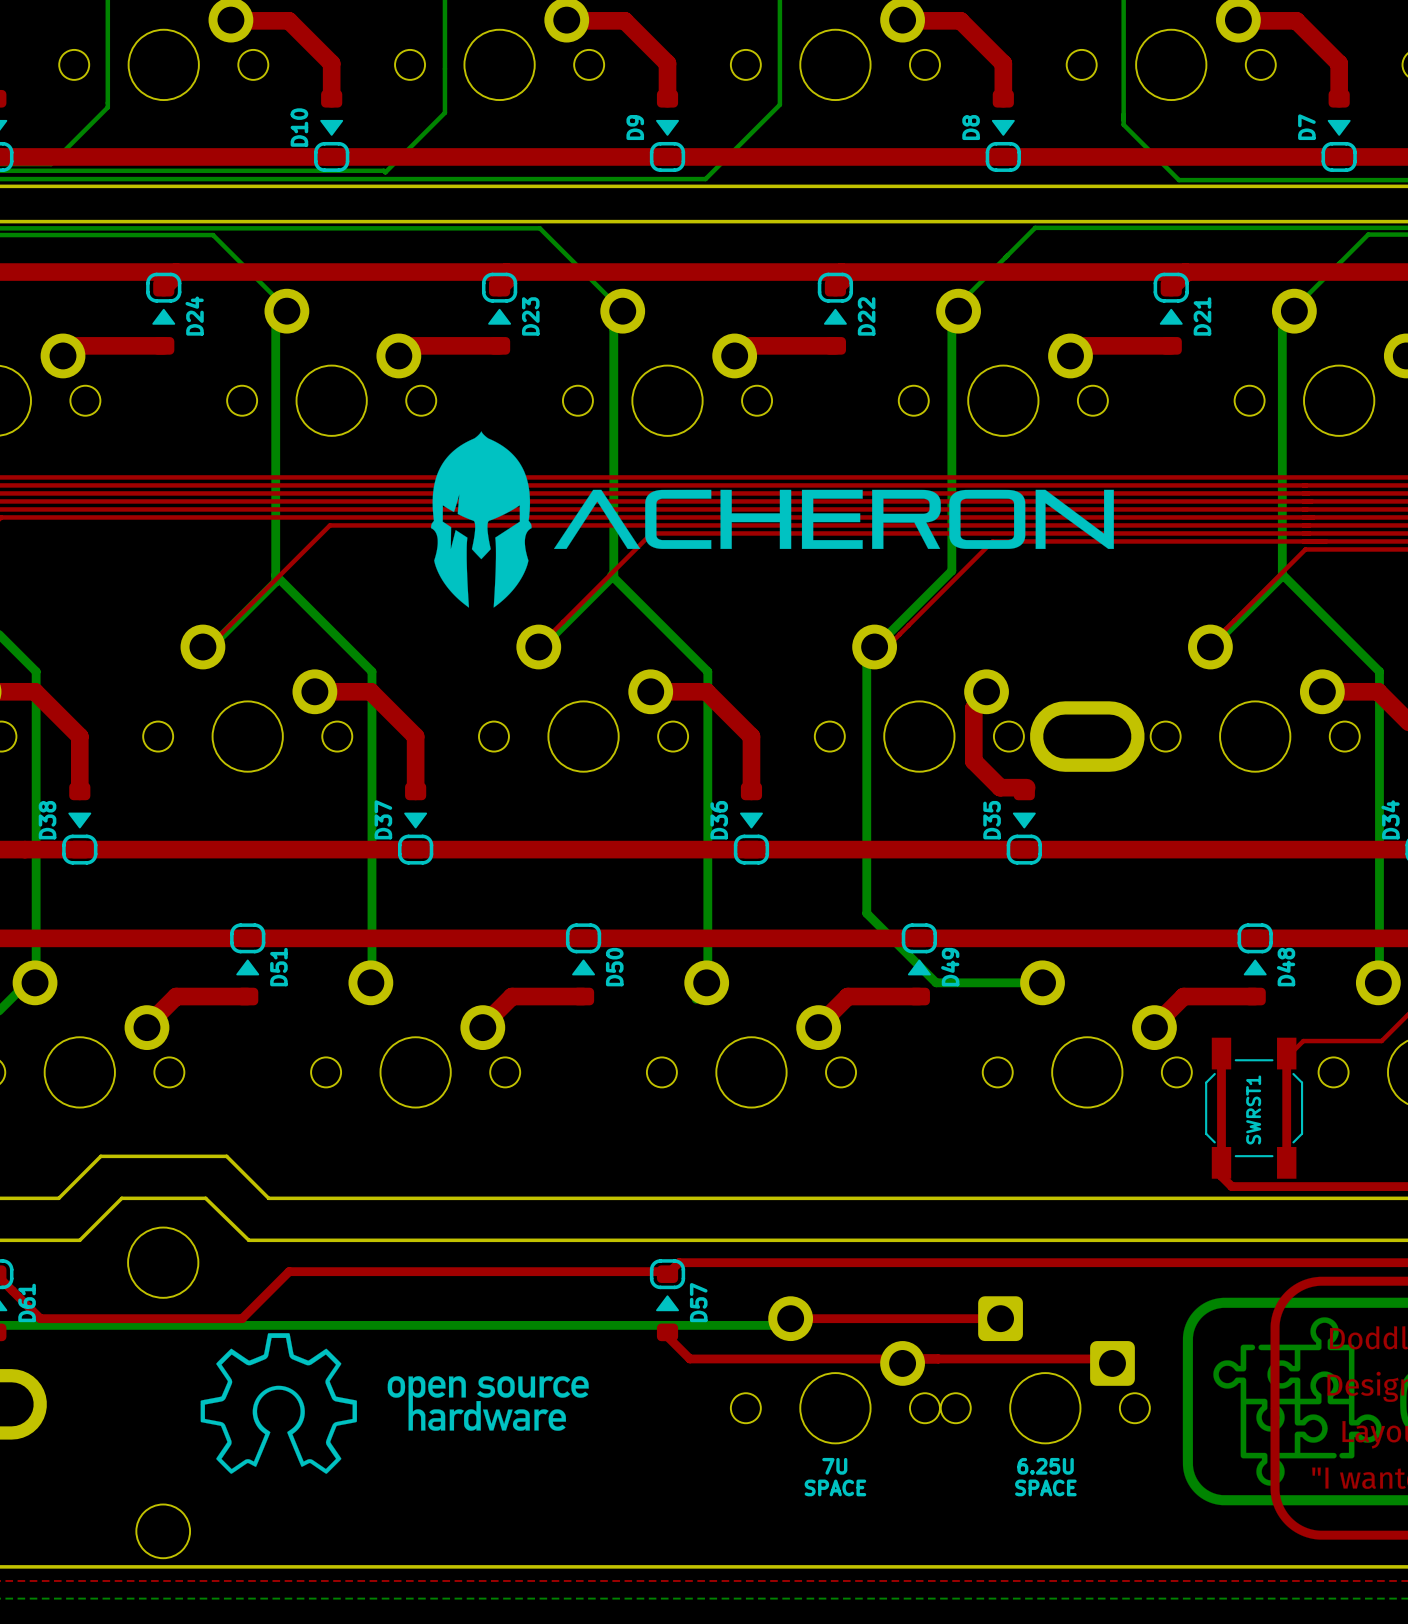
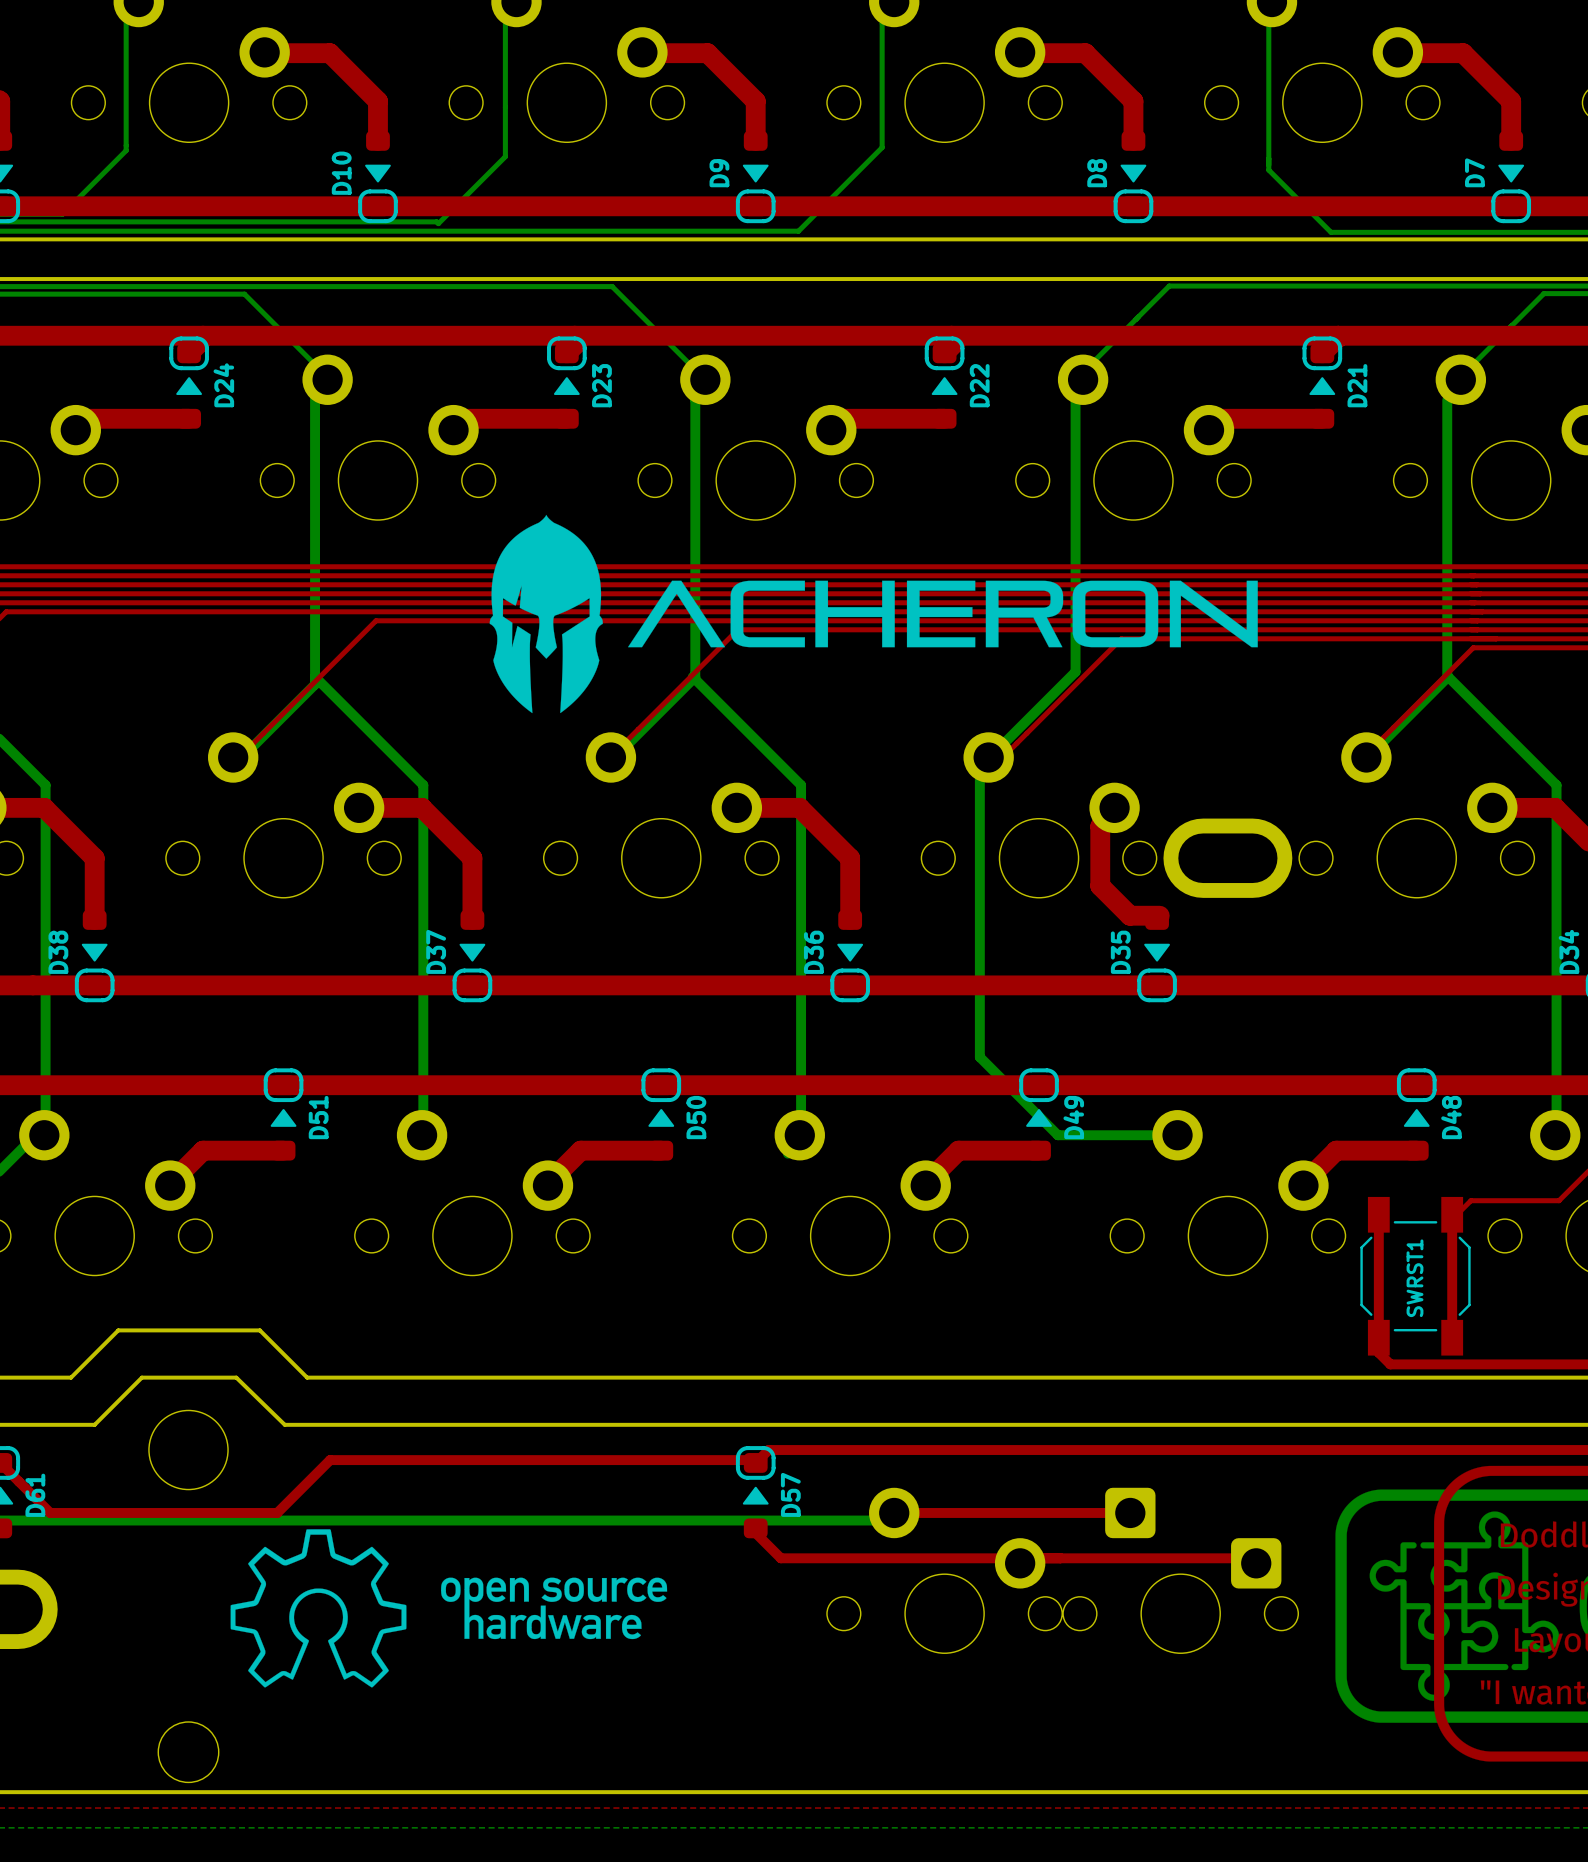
text: 7U (834, 1466) -> none
text: 6.25U (1045, 1466) -> none
text: SPACE (835, 1487) -> none
text: SPACE (1045, 1487) -> none

